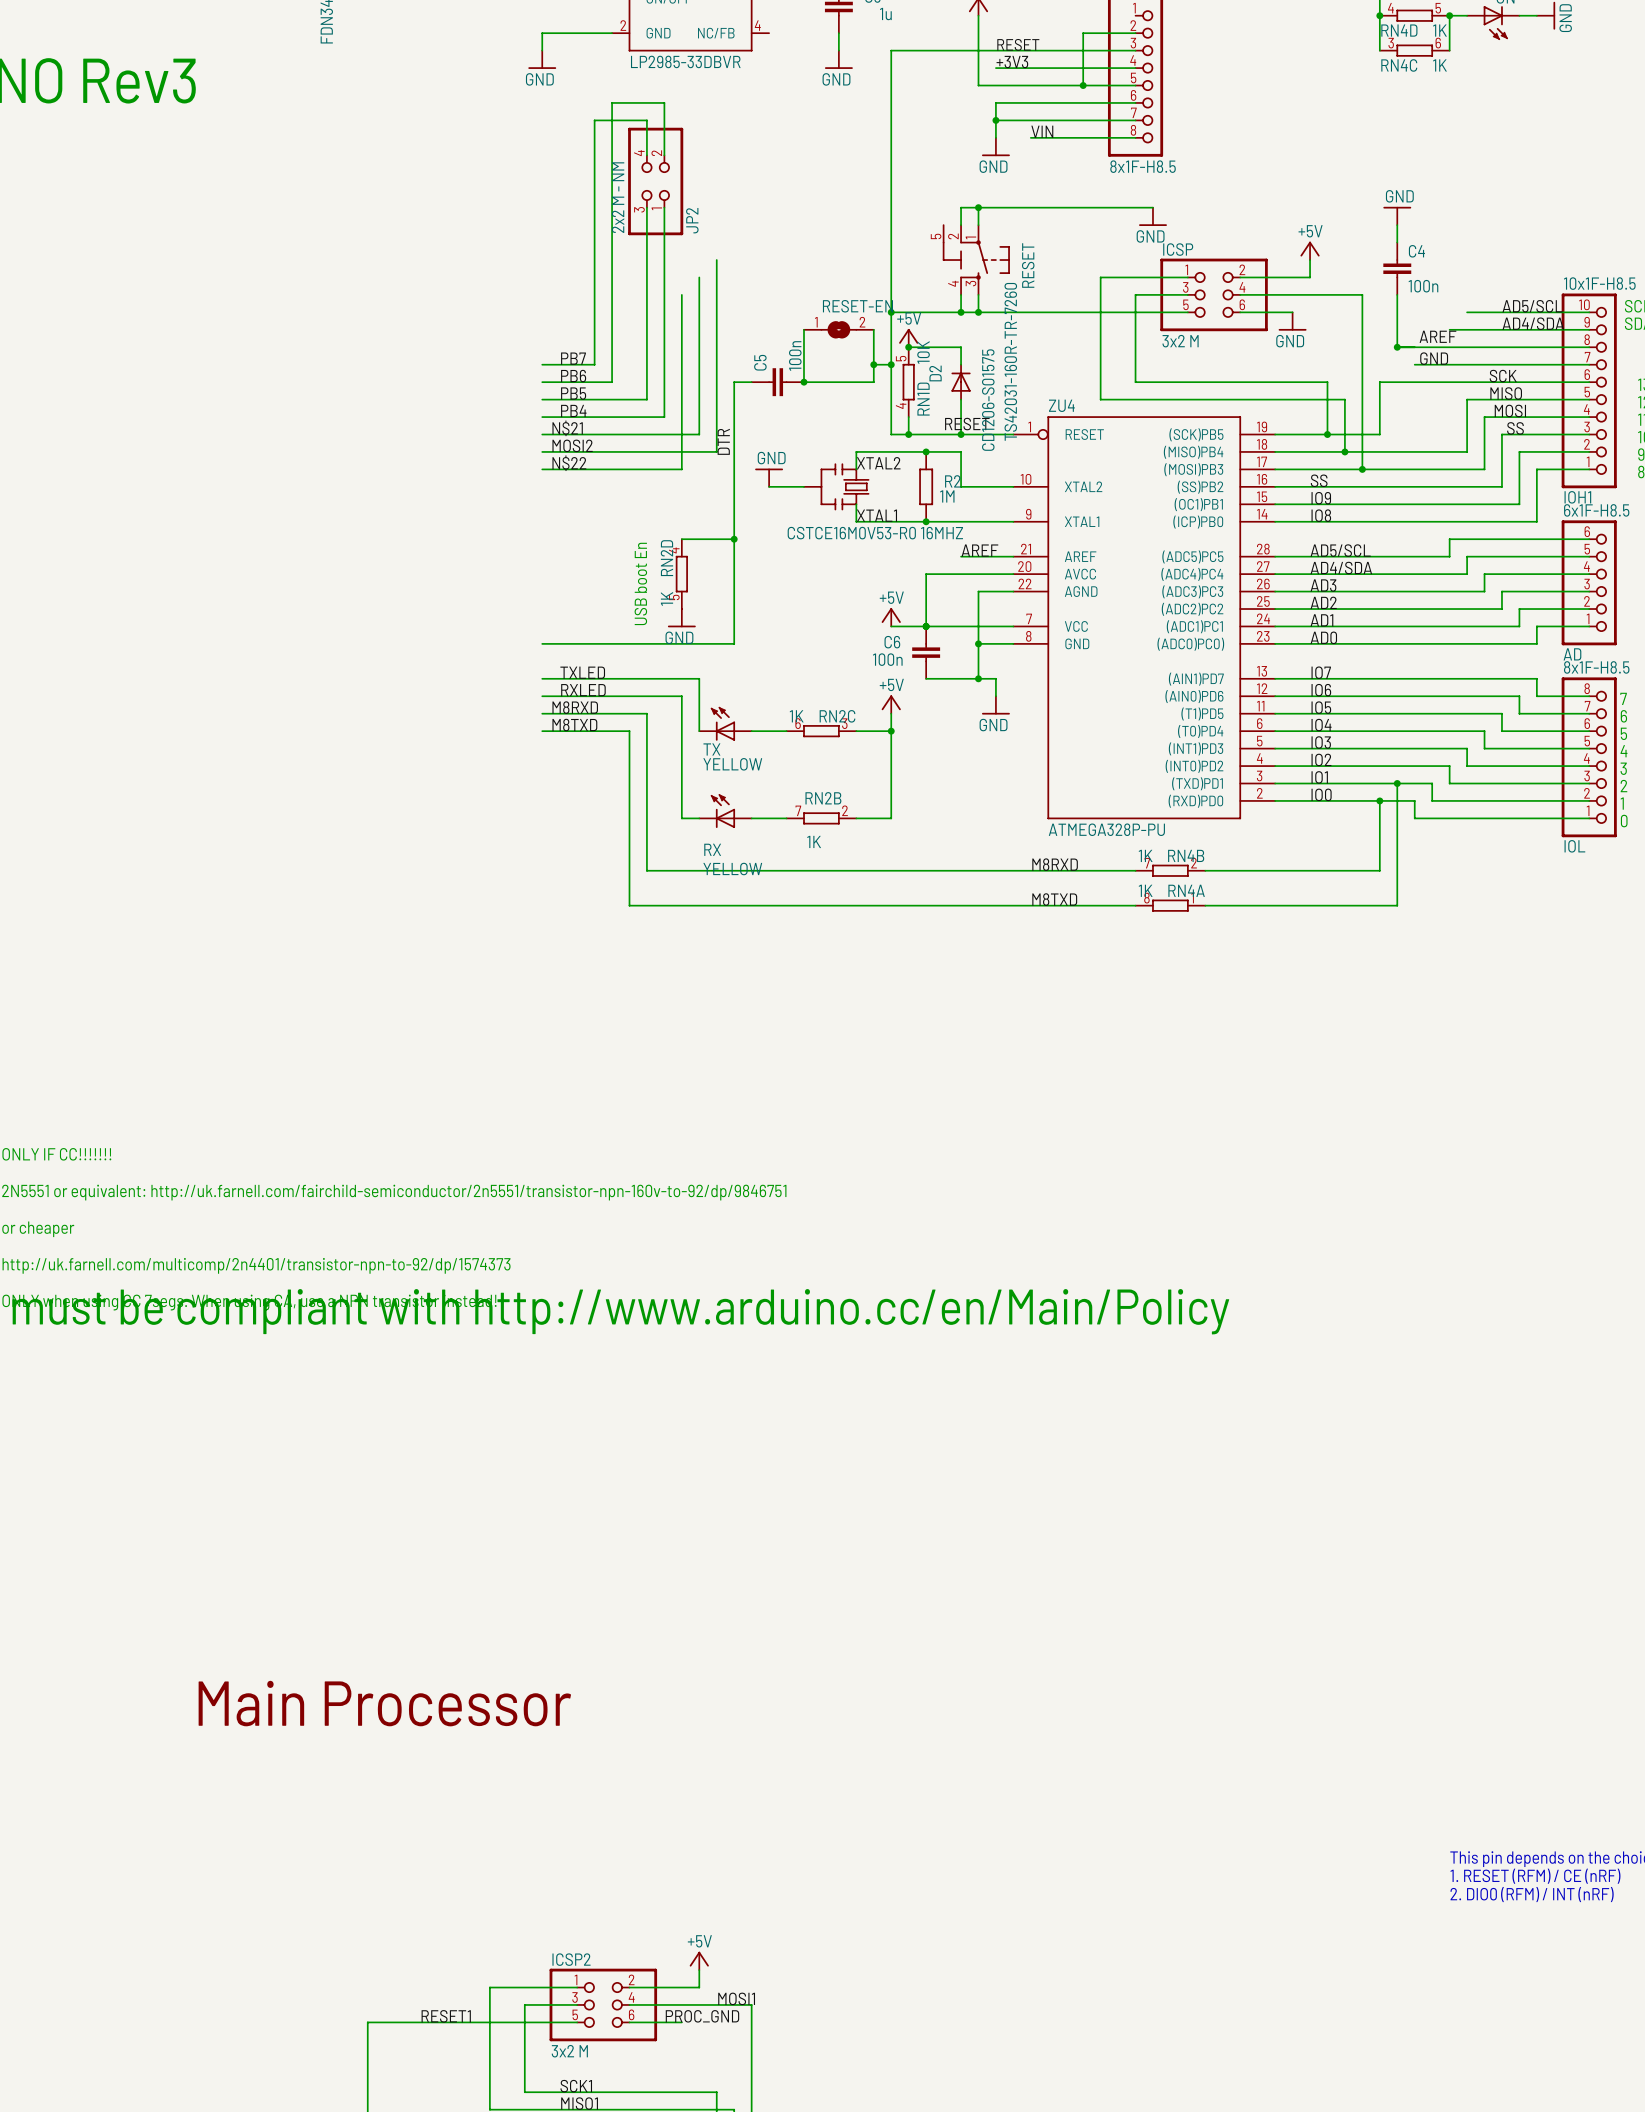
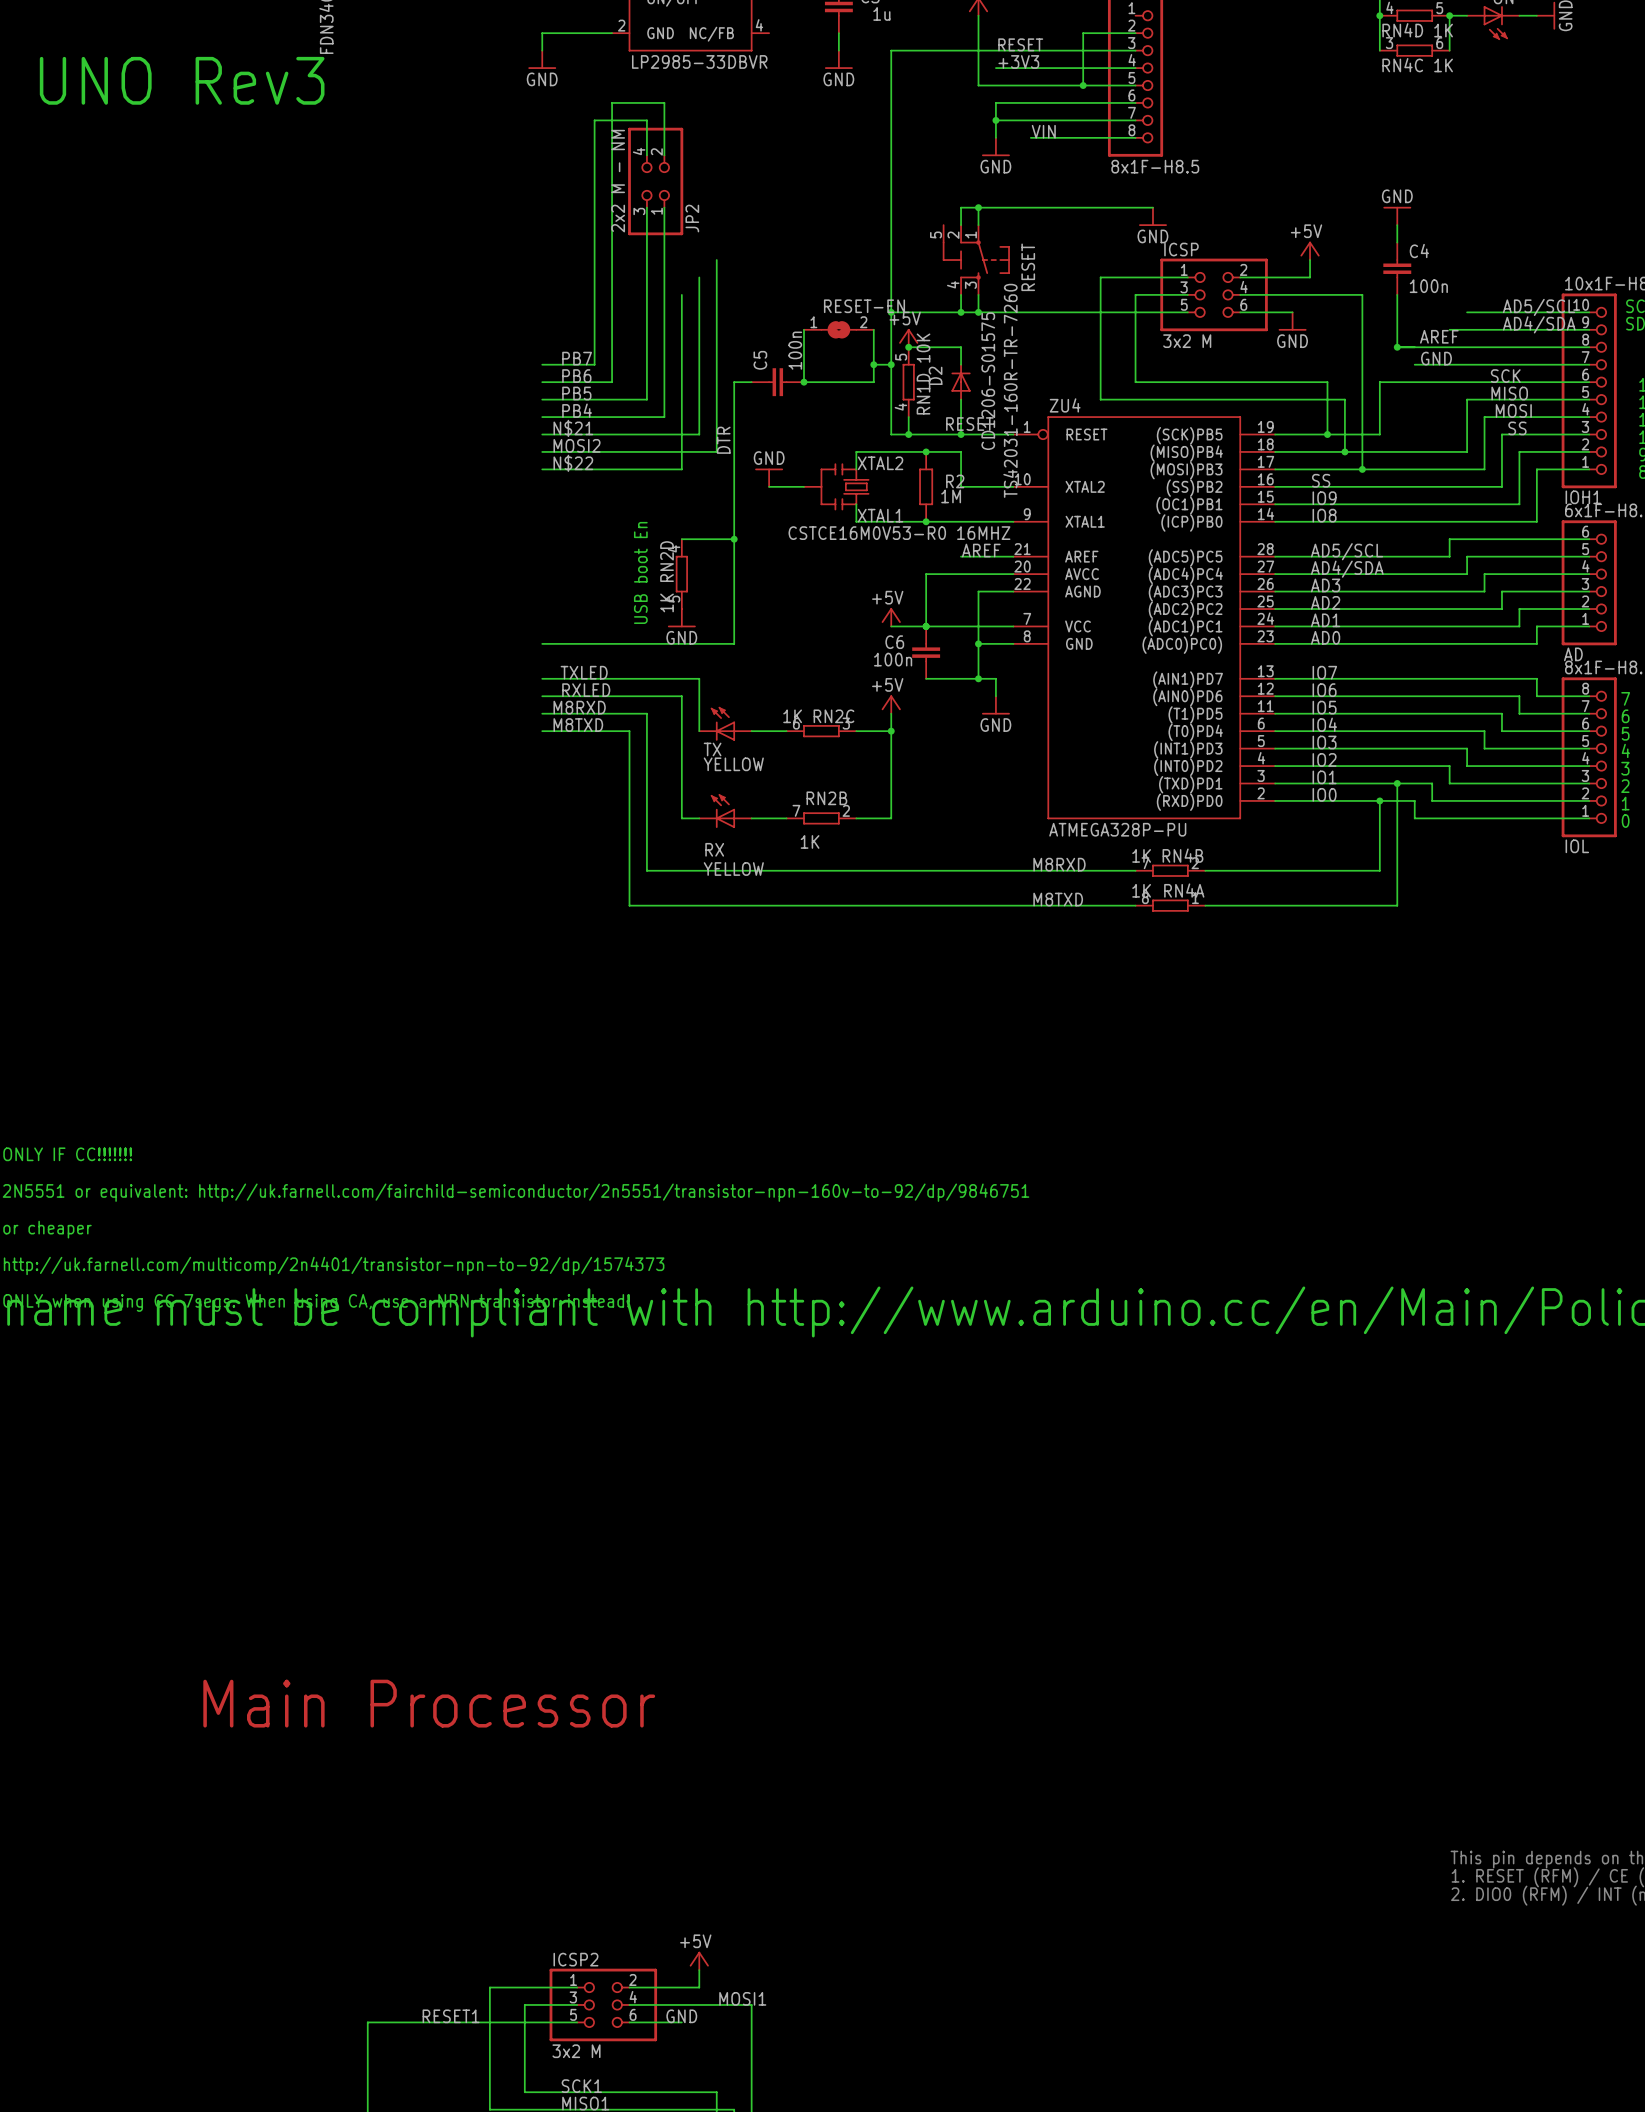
label: PROC_GND (702, 2016) -> GND (681, 2016)

